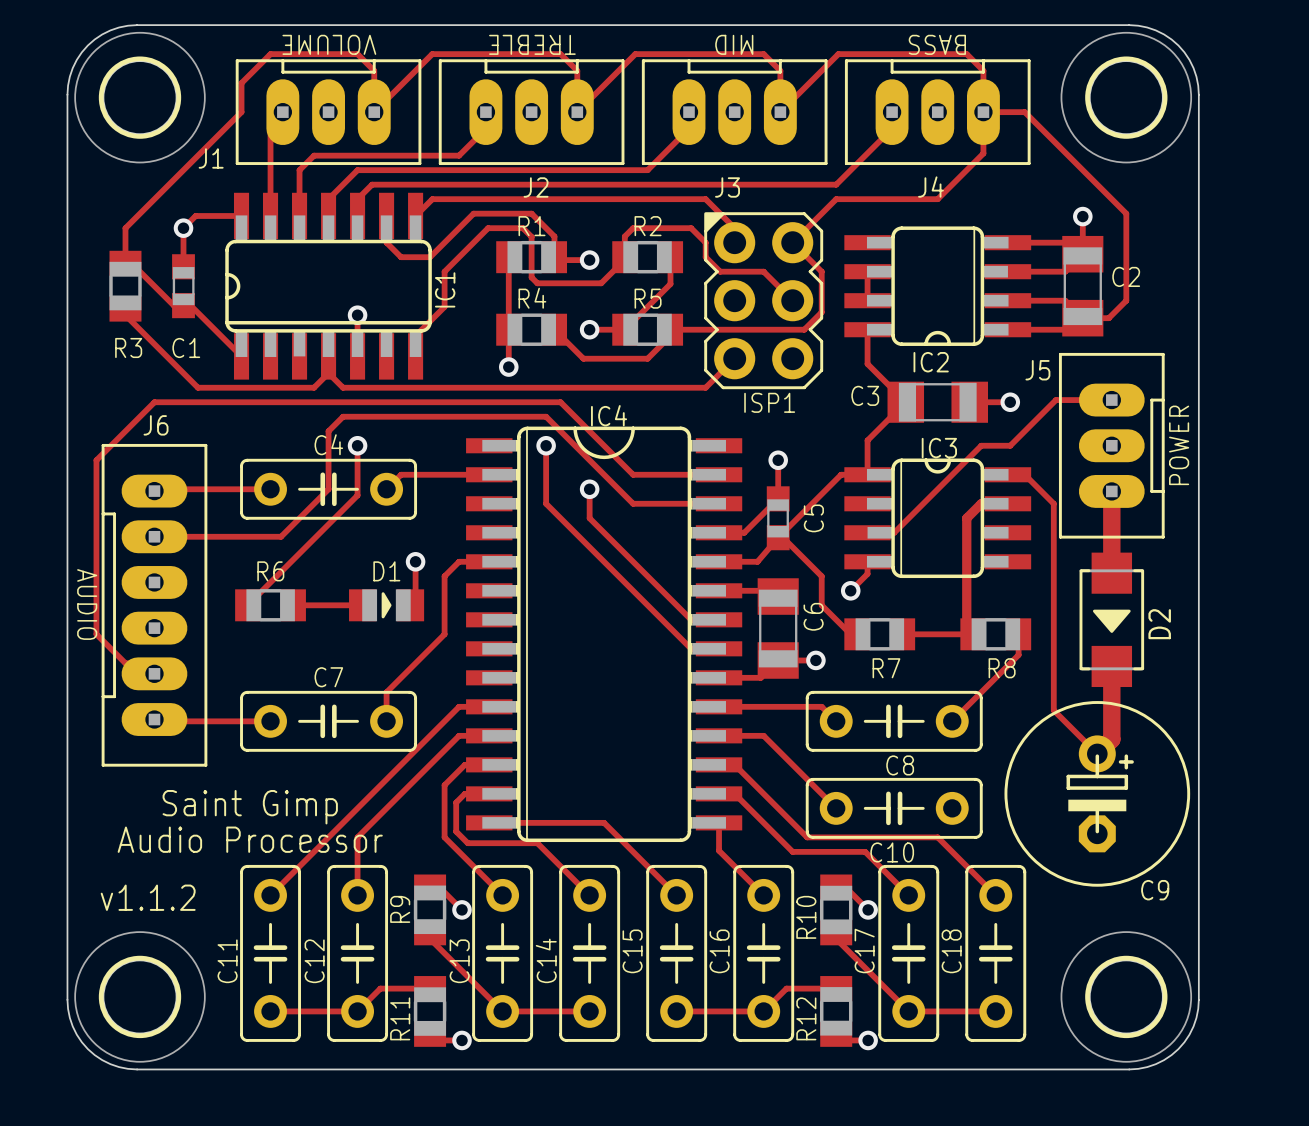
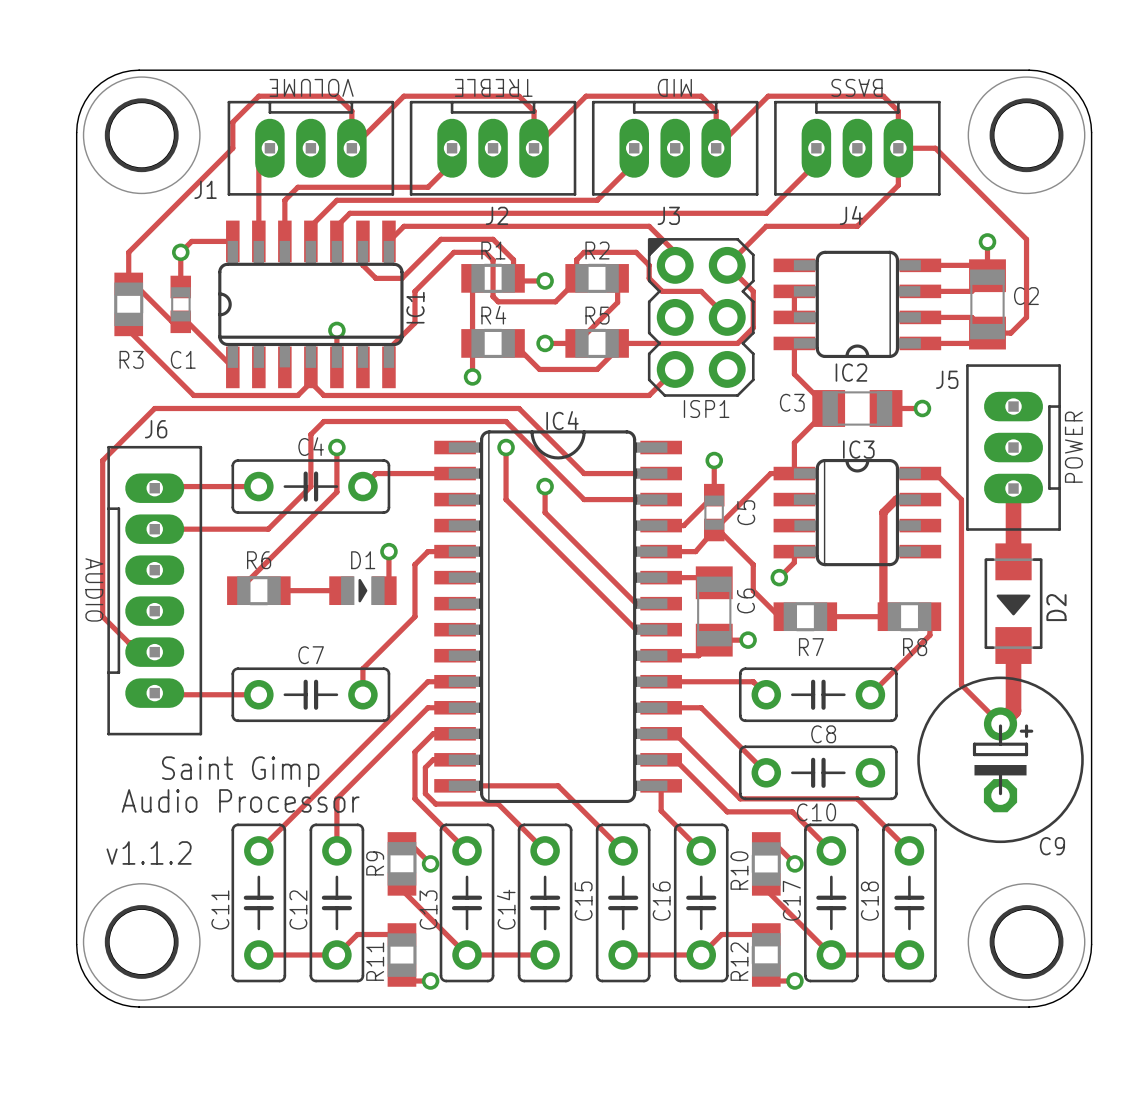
track: (1111, 400) (1055, 400) (1010, 445) (981, 445) (894, 532) (867, 532) -> none

